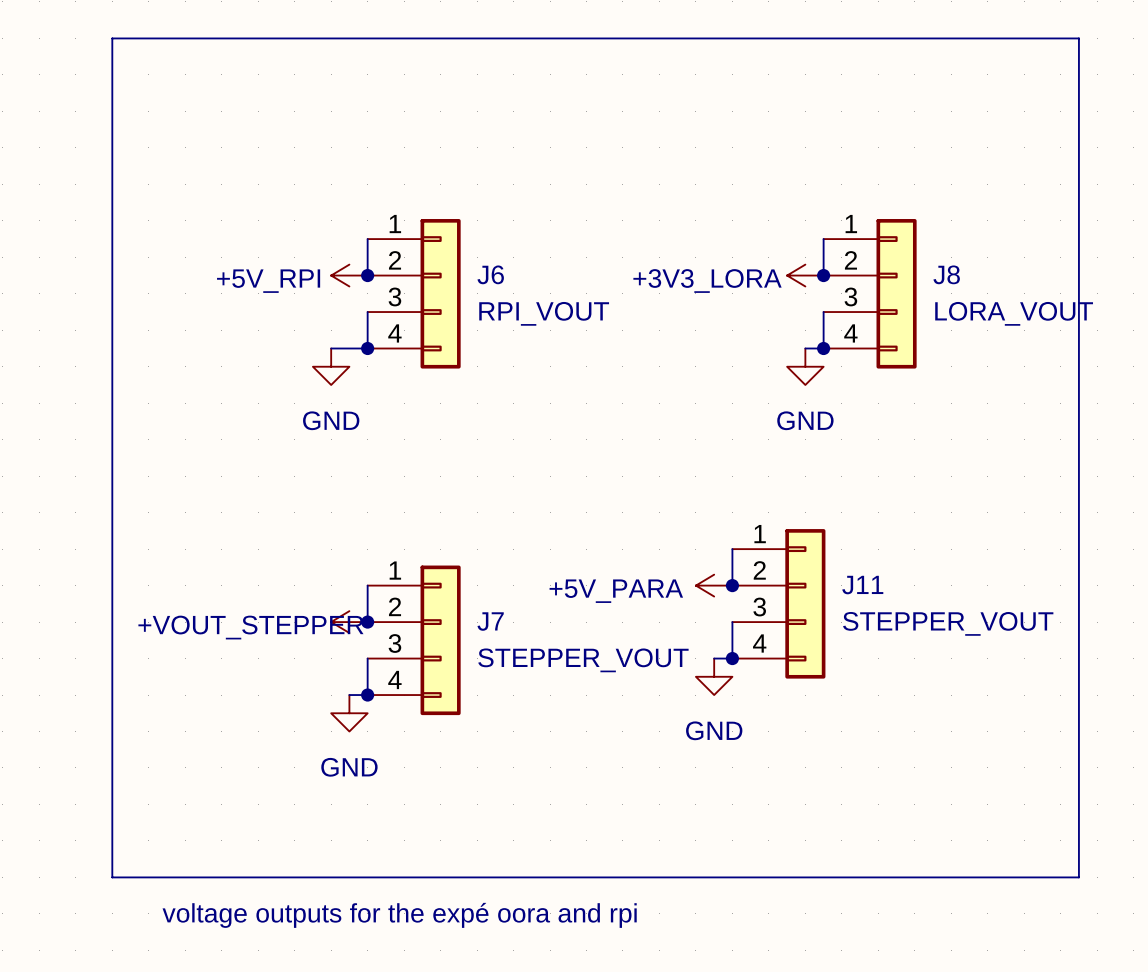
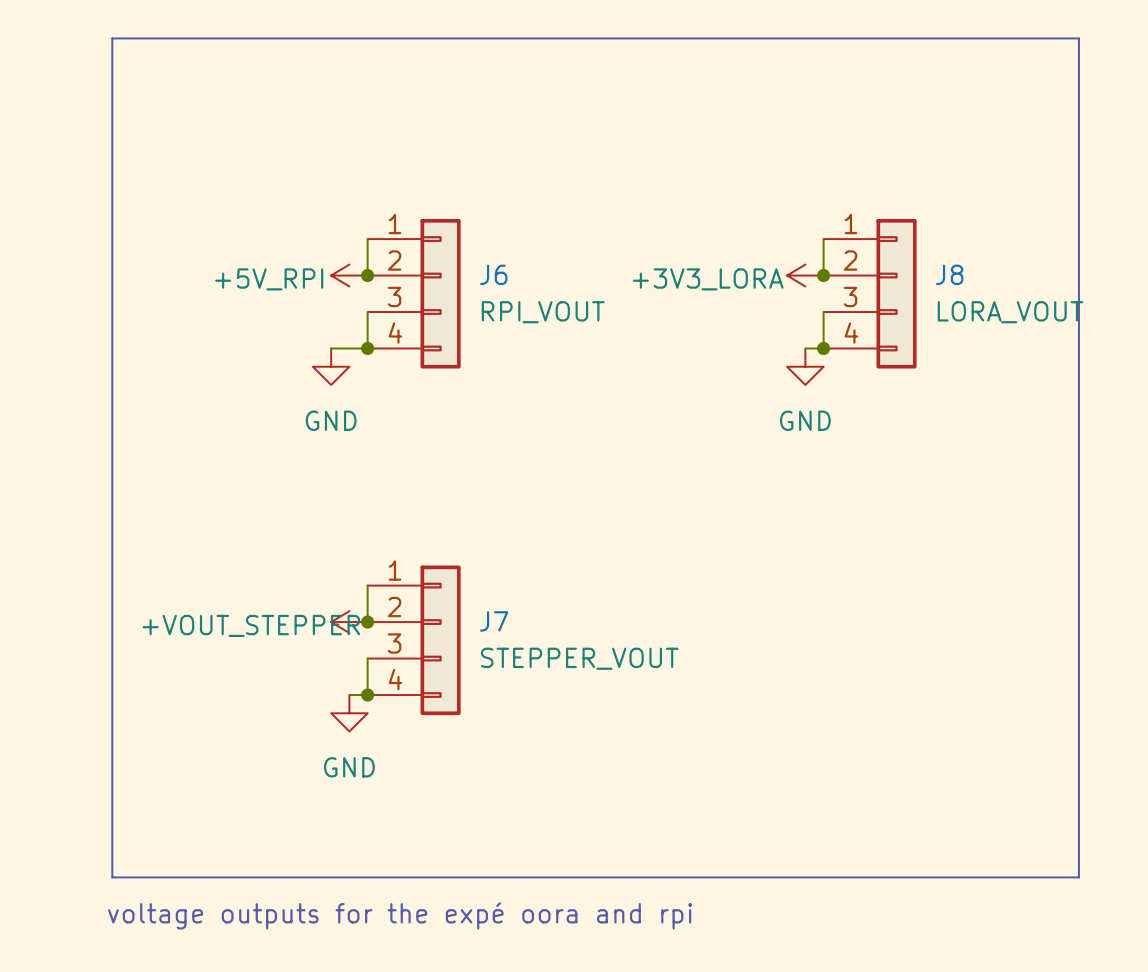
wire: (732, 549) (732, 585) -> none
power symbol: +5V_PARA (714, 585) -> none
junction: (732, 585) -> none
J11: STEPPER_VOUT (778, 603) -> none
wire: (732, 622) (732, 658) (714, 658) -> none
junction: (732, 658) -> none
power symbol: GND (714, 676) -> none

